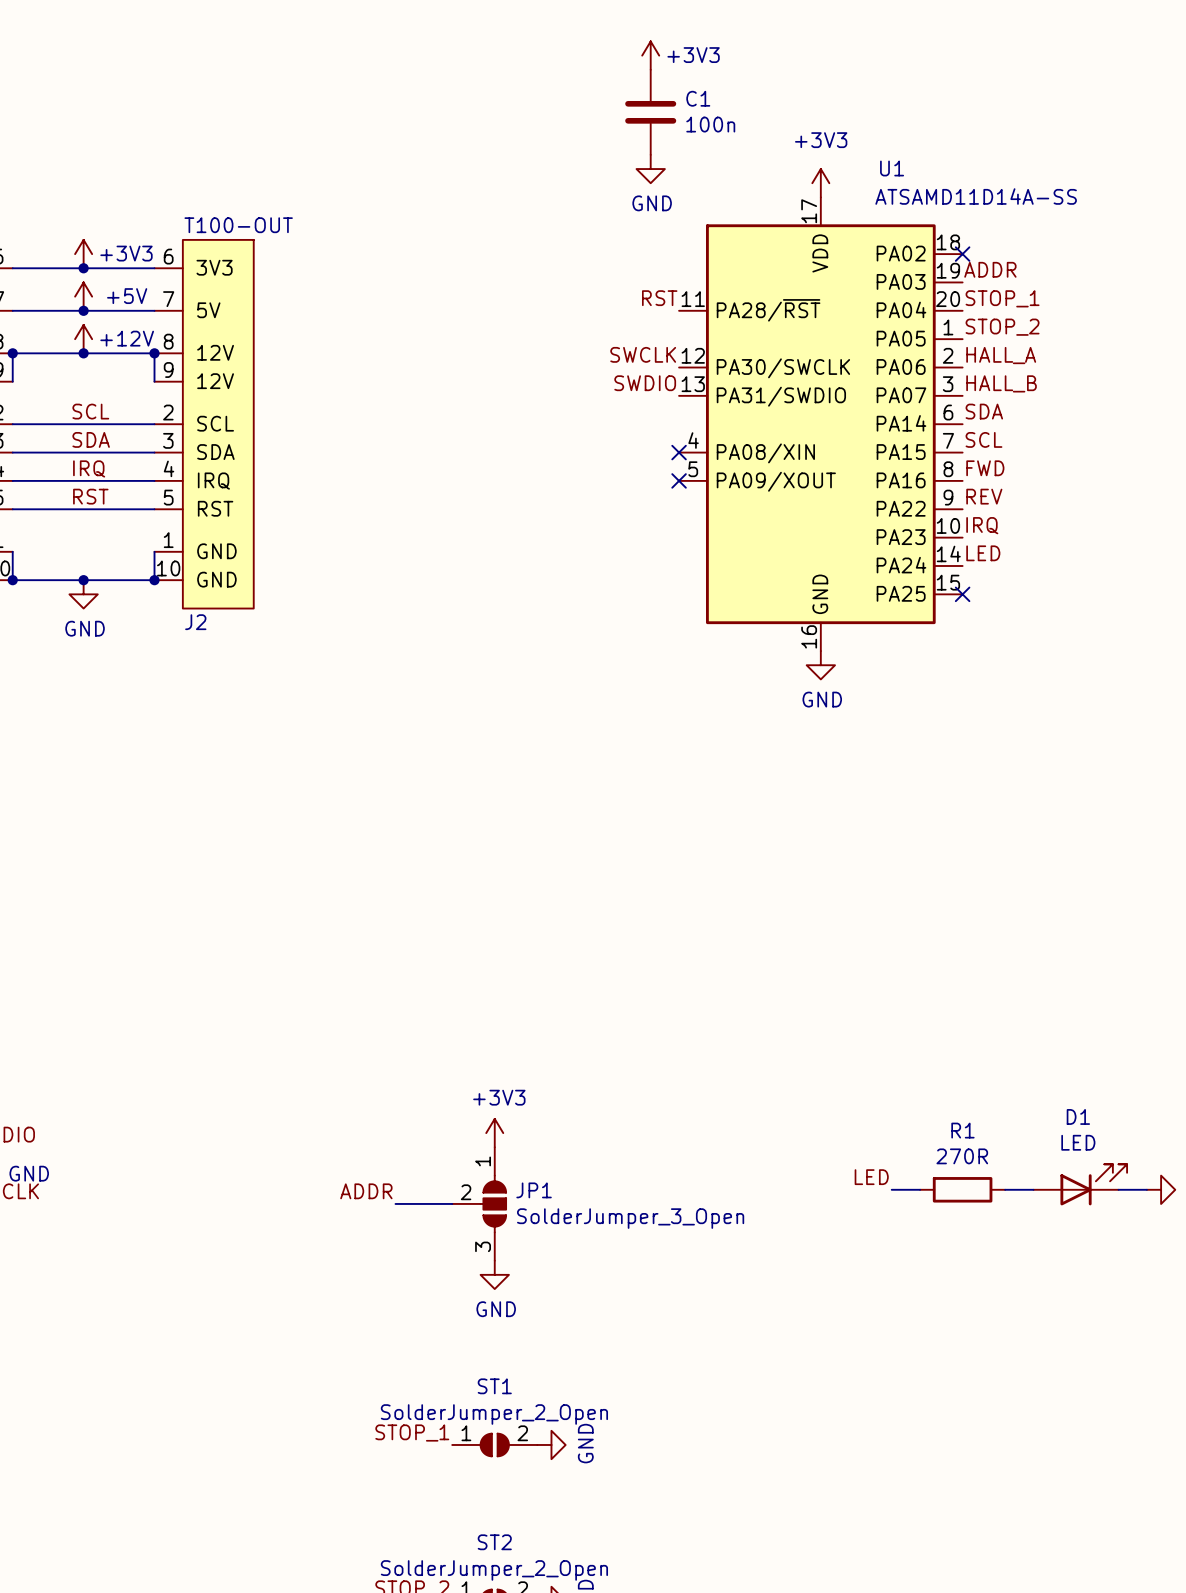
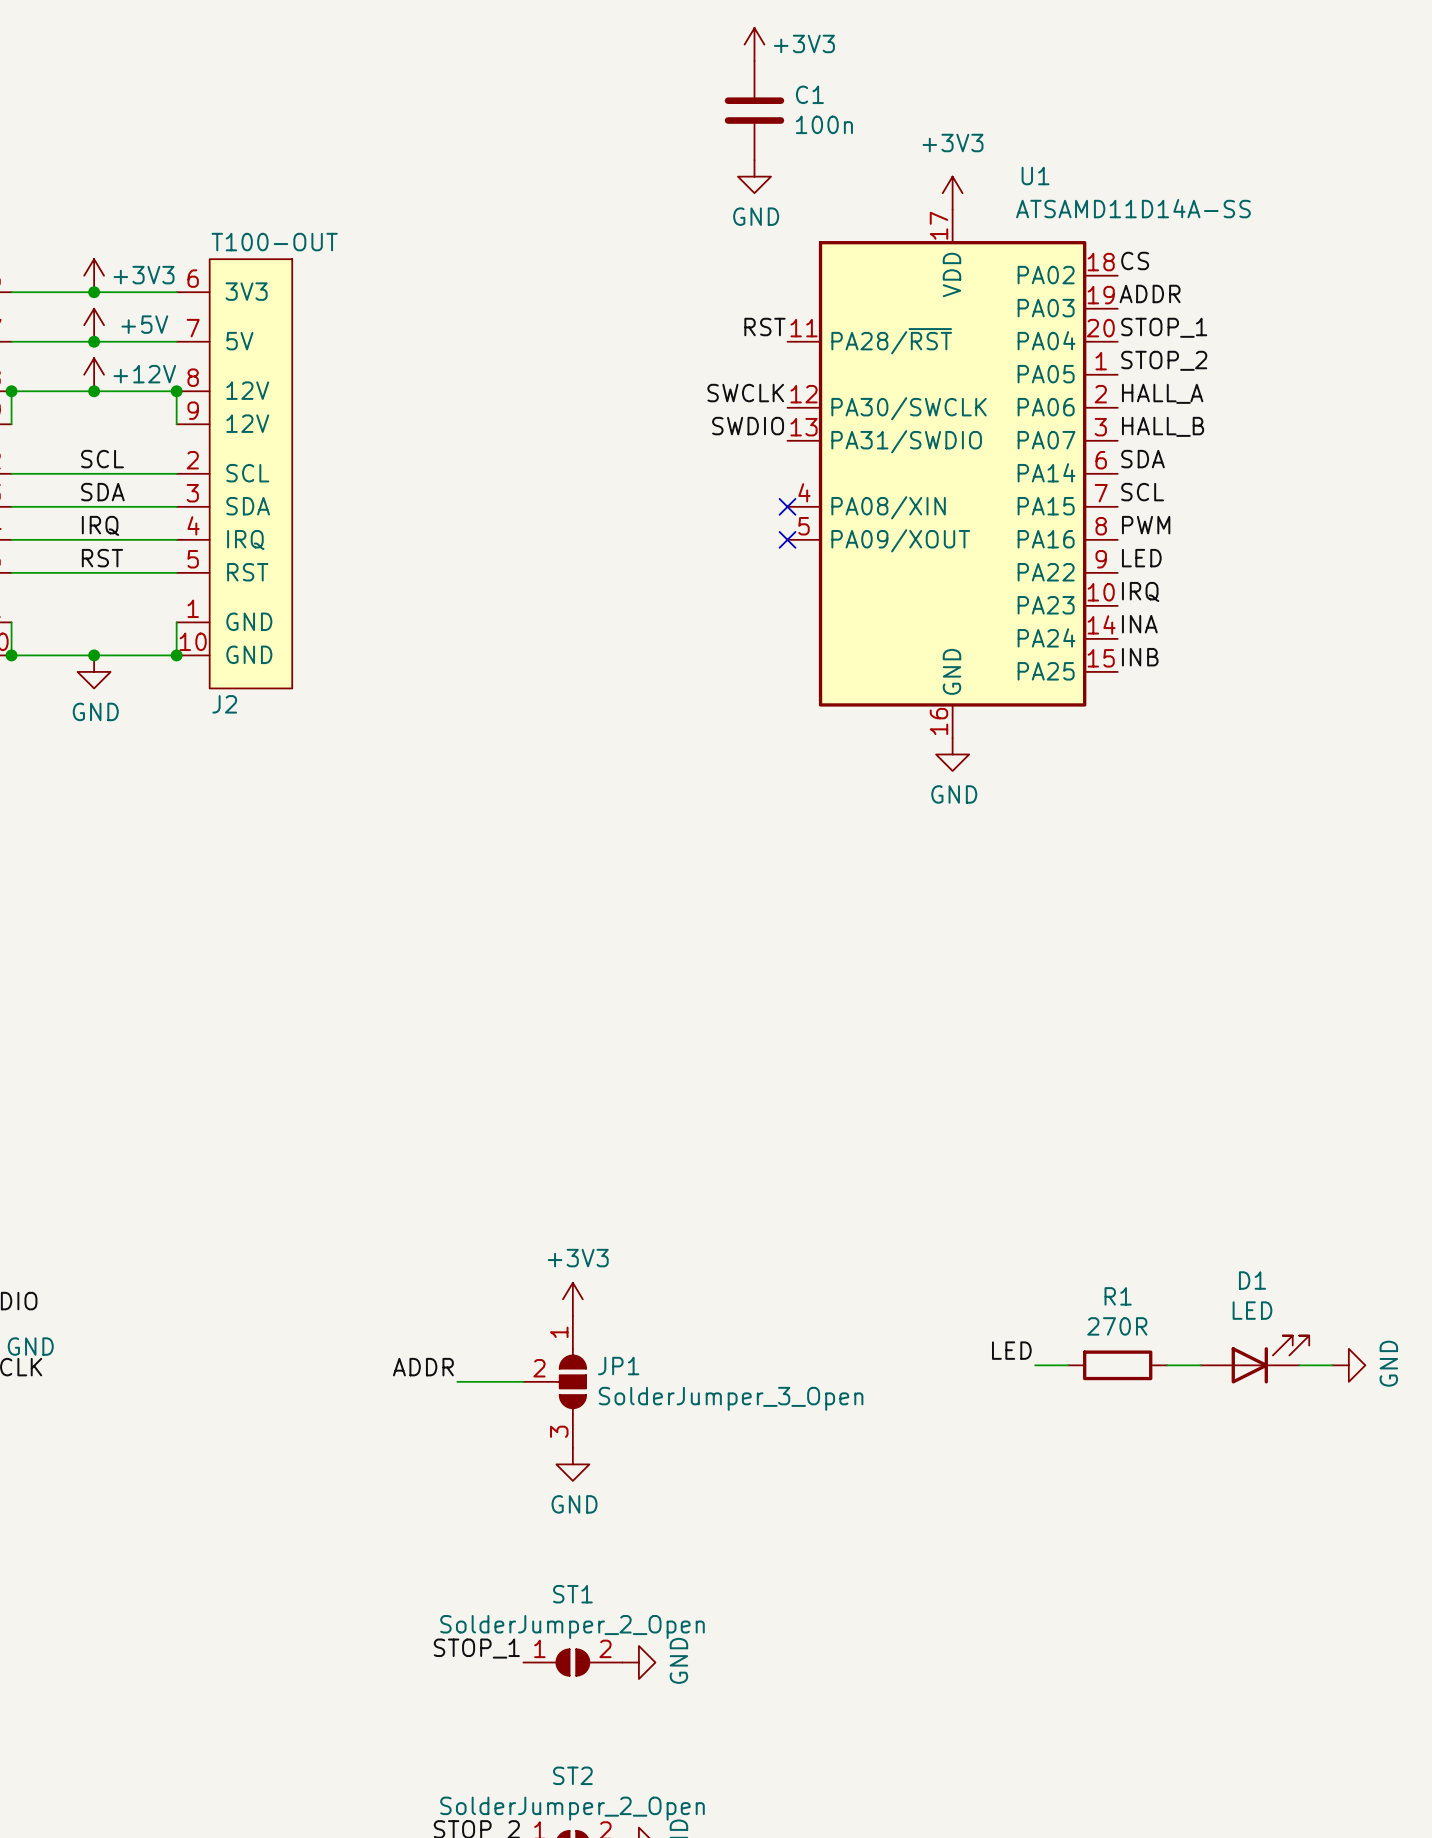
label: none -> CS (1135, 260)
no-connect mark: (962, 254) -> none
label: FWD (985, 468) -> PWM (1146, 525)
label: REV (984, 496) -> LED (1141, 558)
label: LED (983, 553) -> INA (1139, 624)
label: none -> INB (1140, 657)
no-connect mark: (962, 594) -> none

